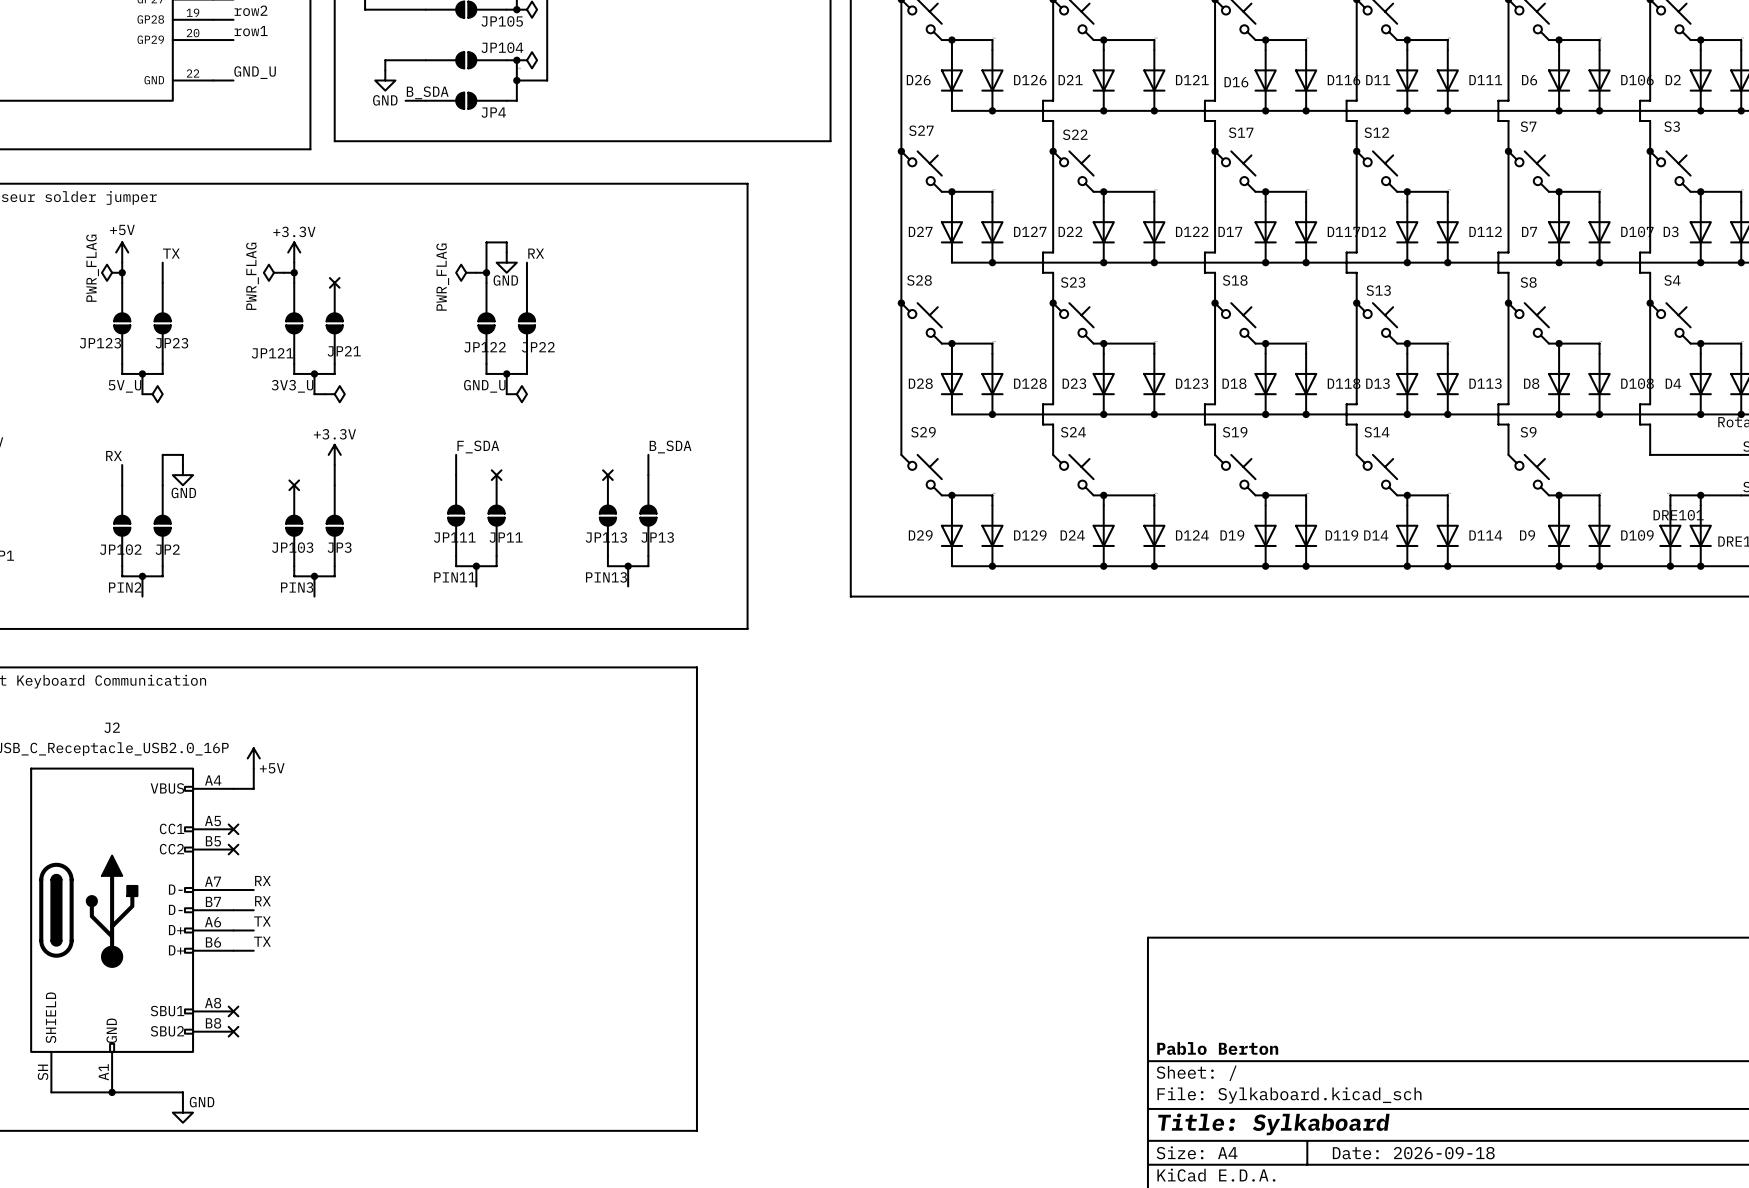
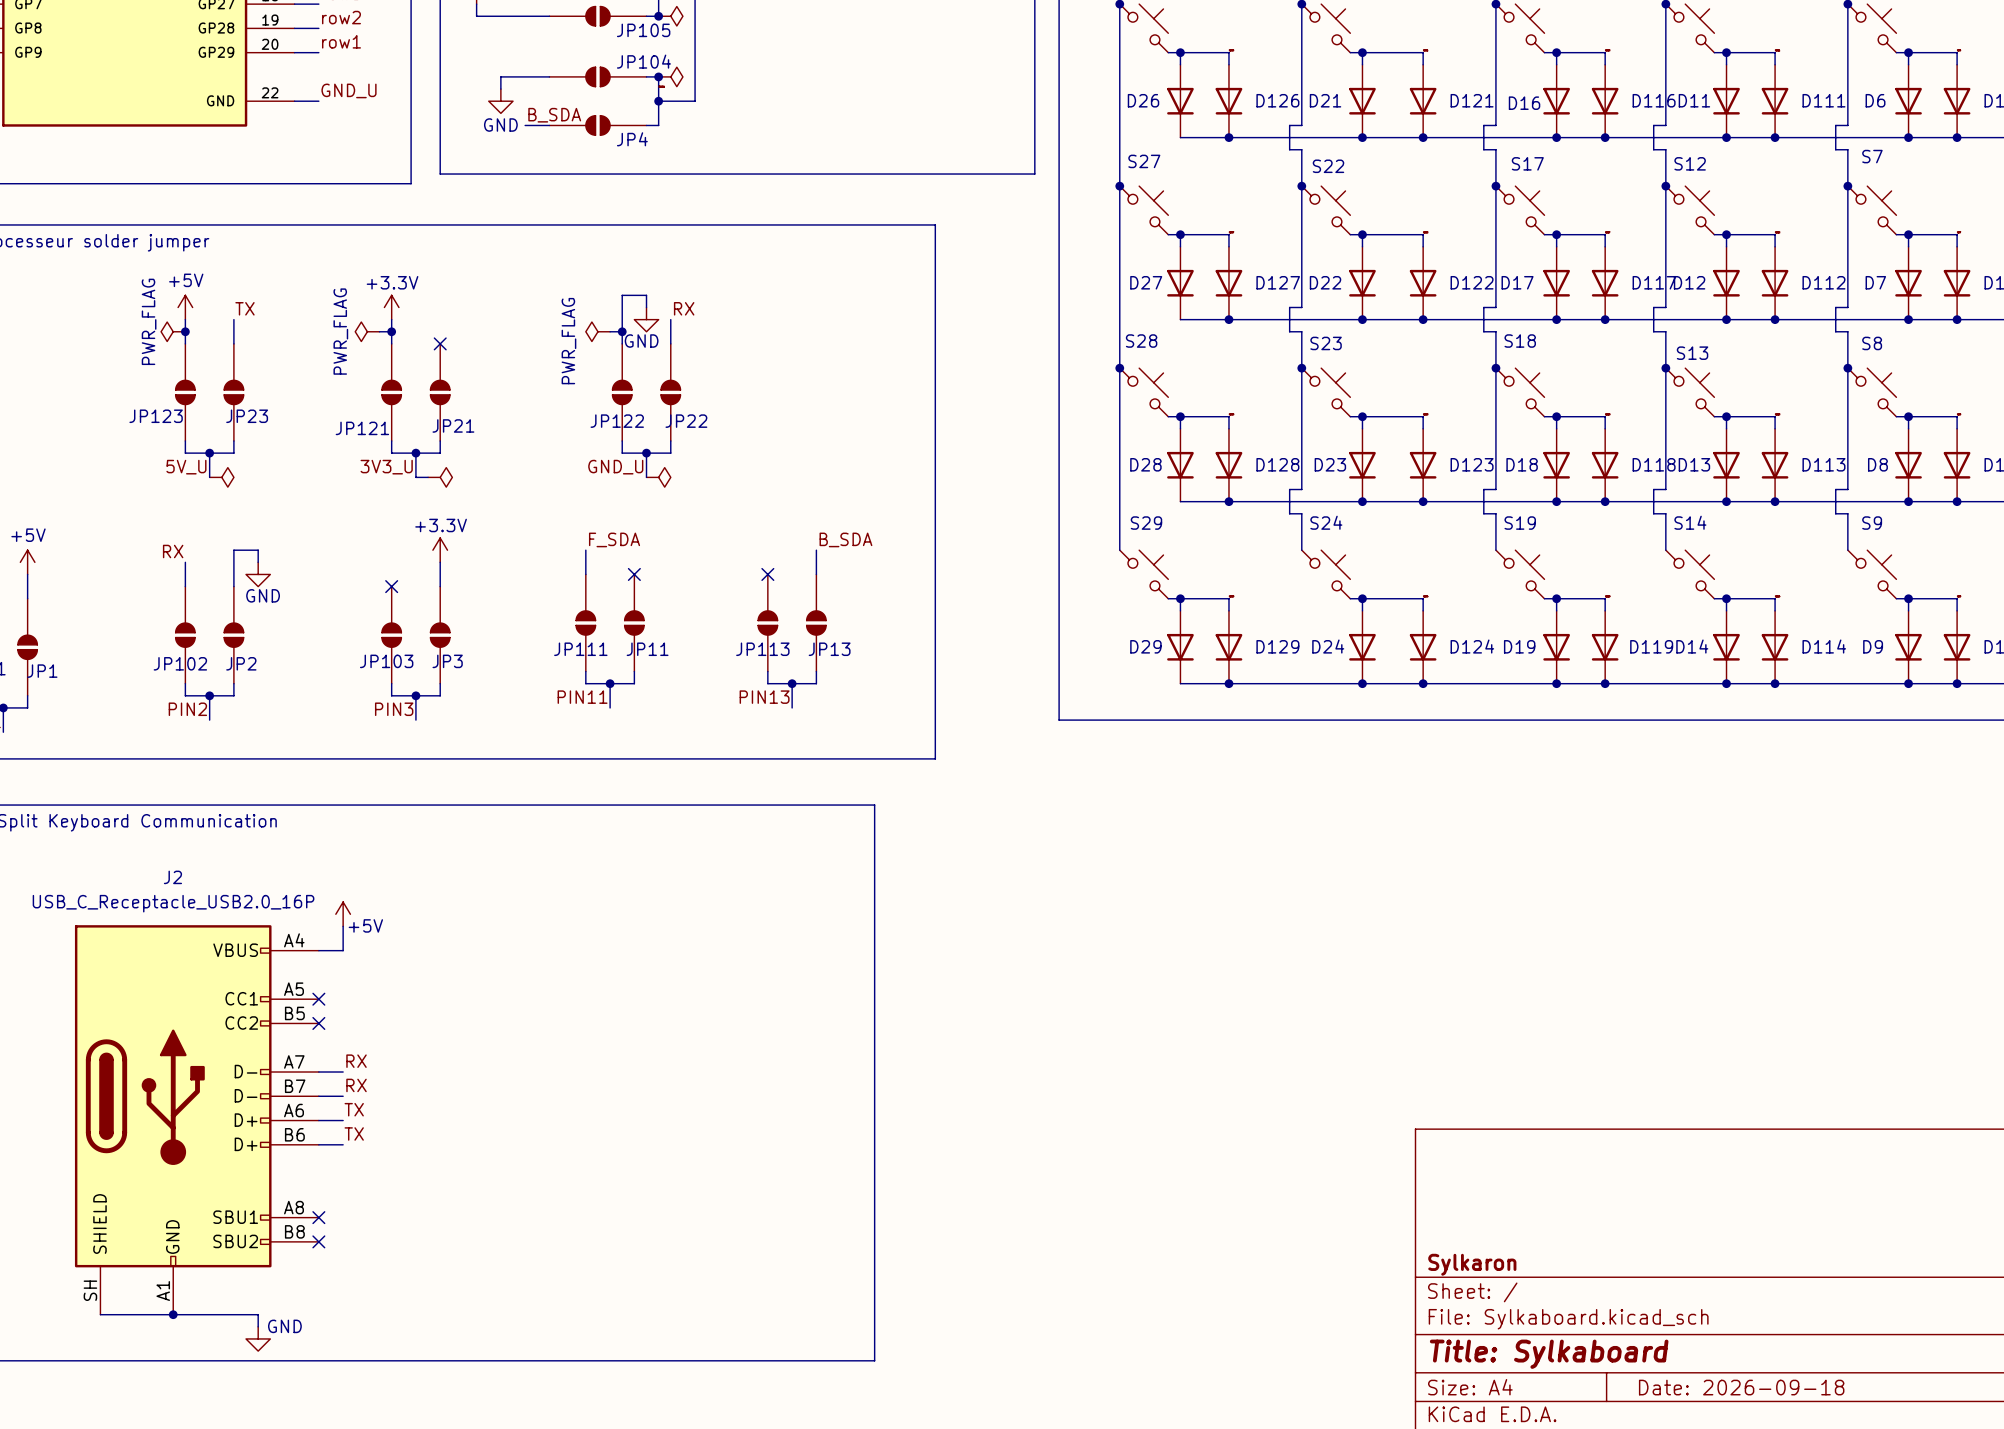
title block: Pablo Berton (1217, 1048) -> Sylkaron (1472, 1264)

